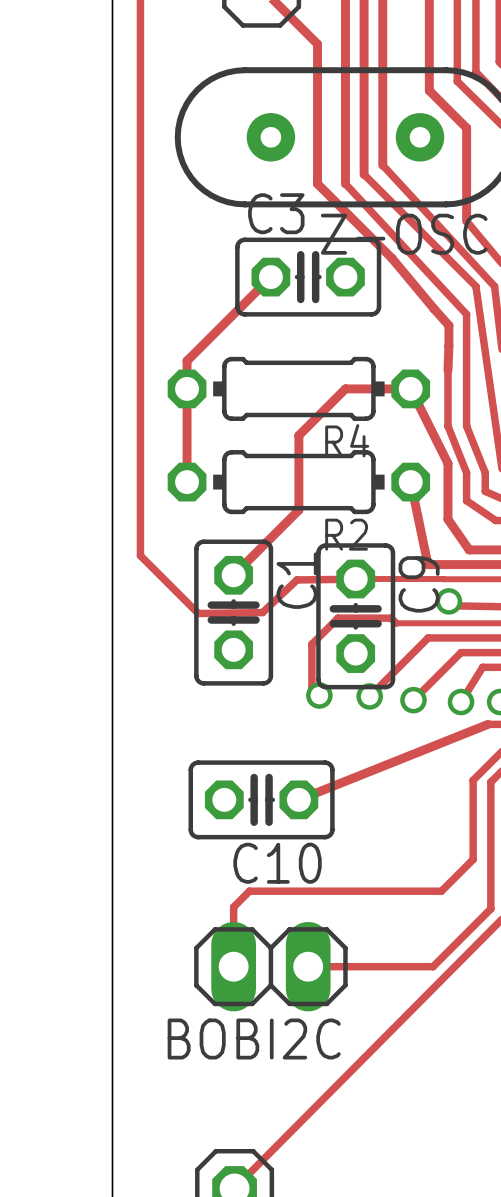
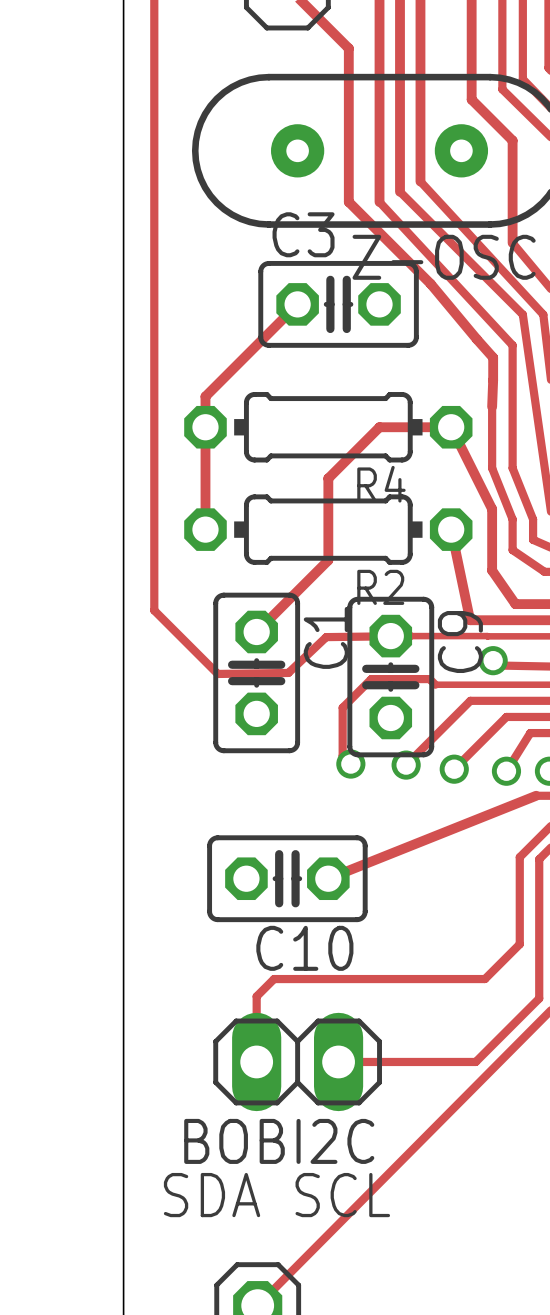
text: none -> SDA SCL (276, 1195)

